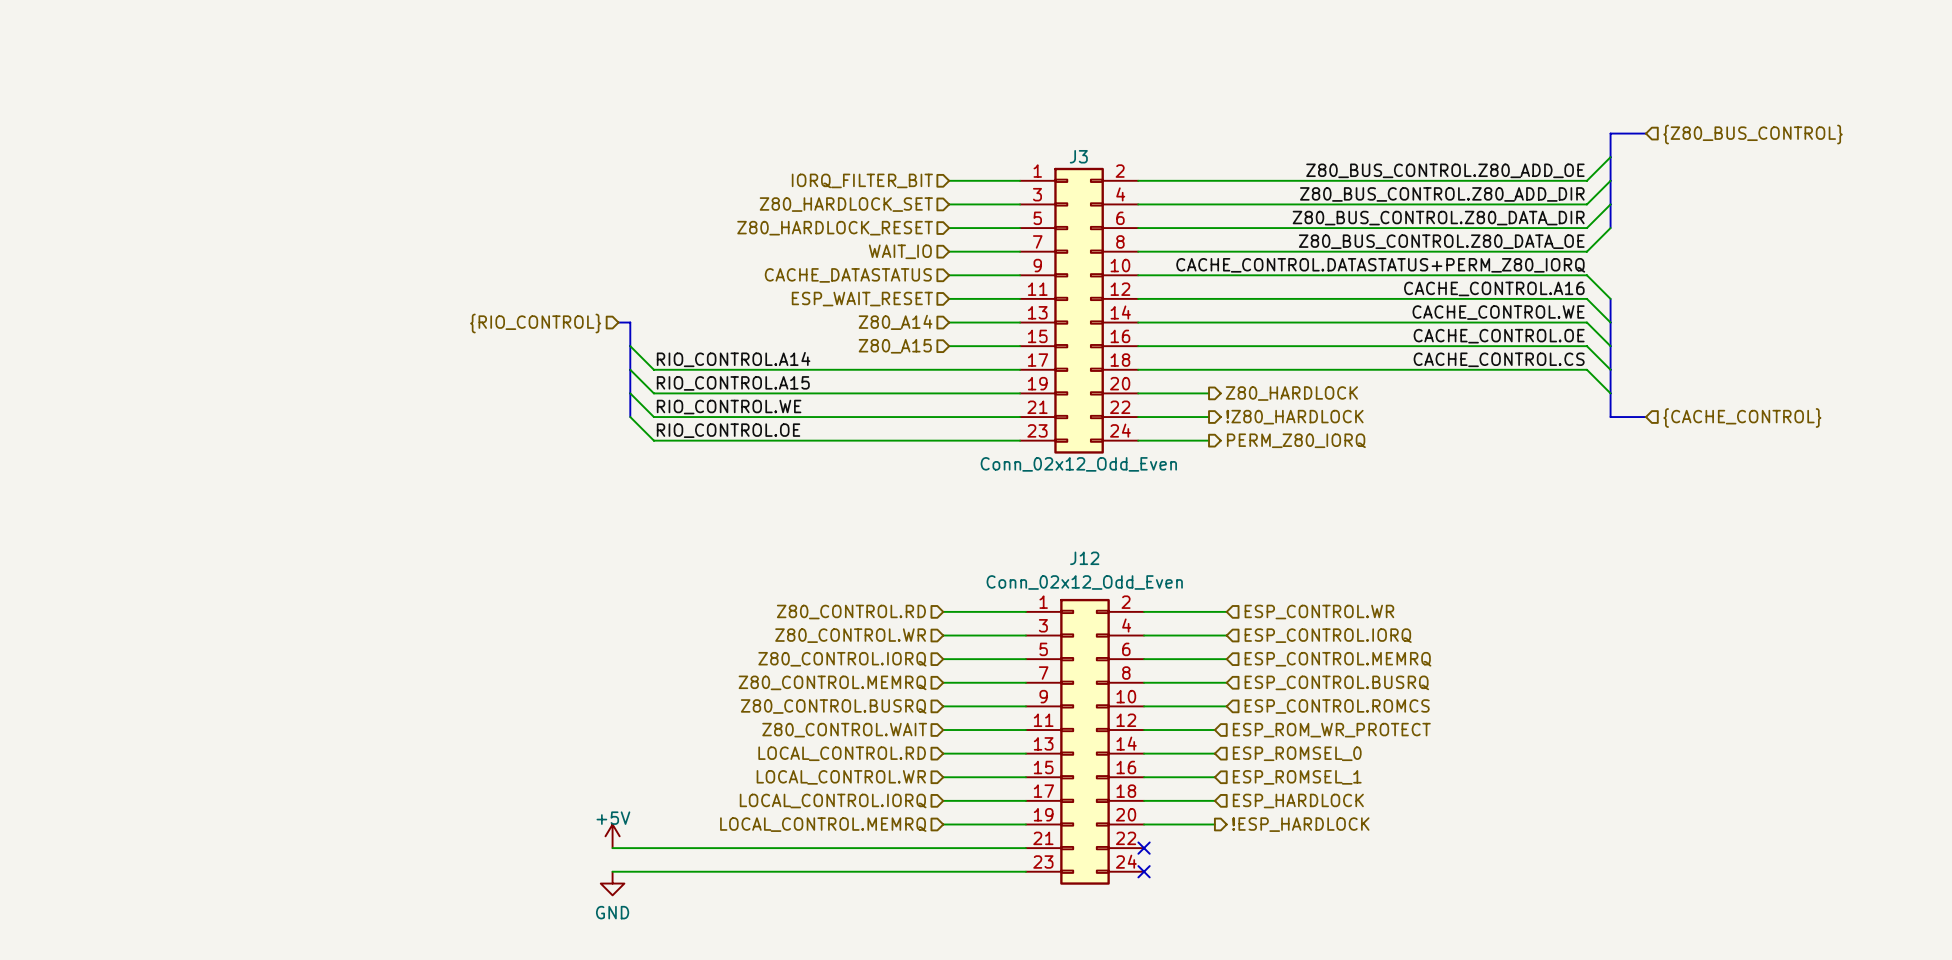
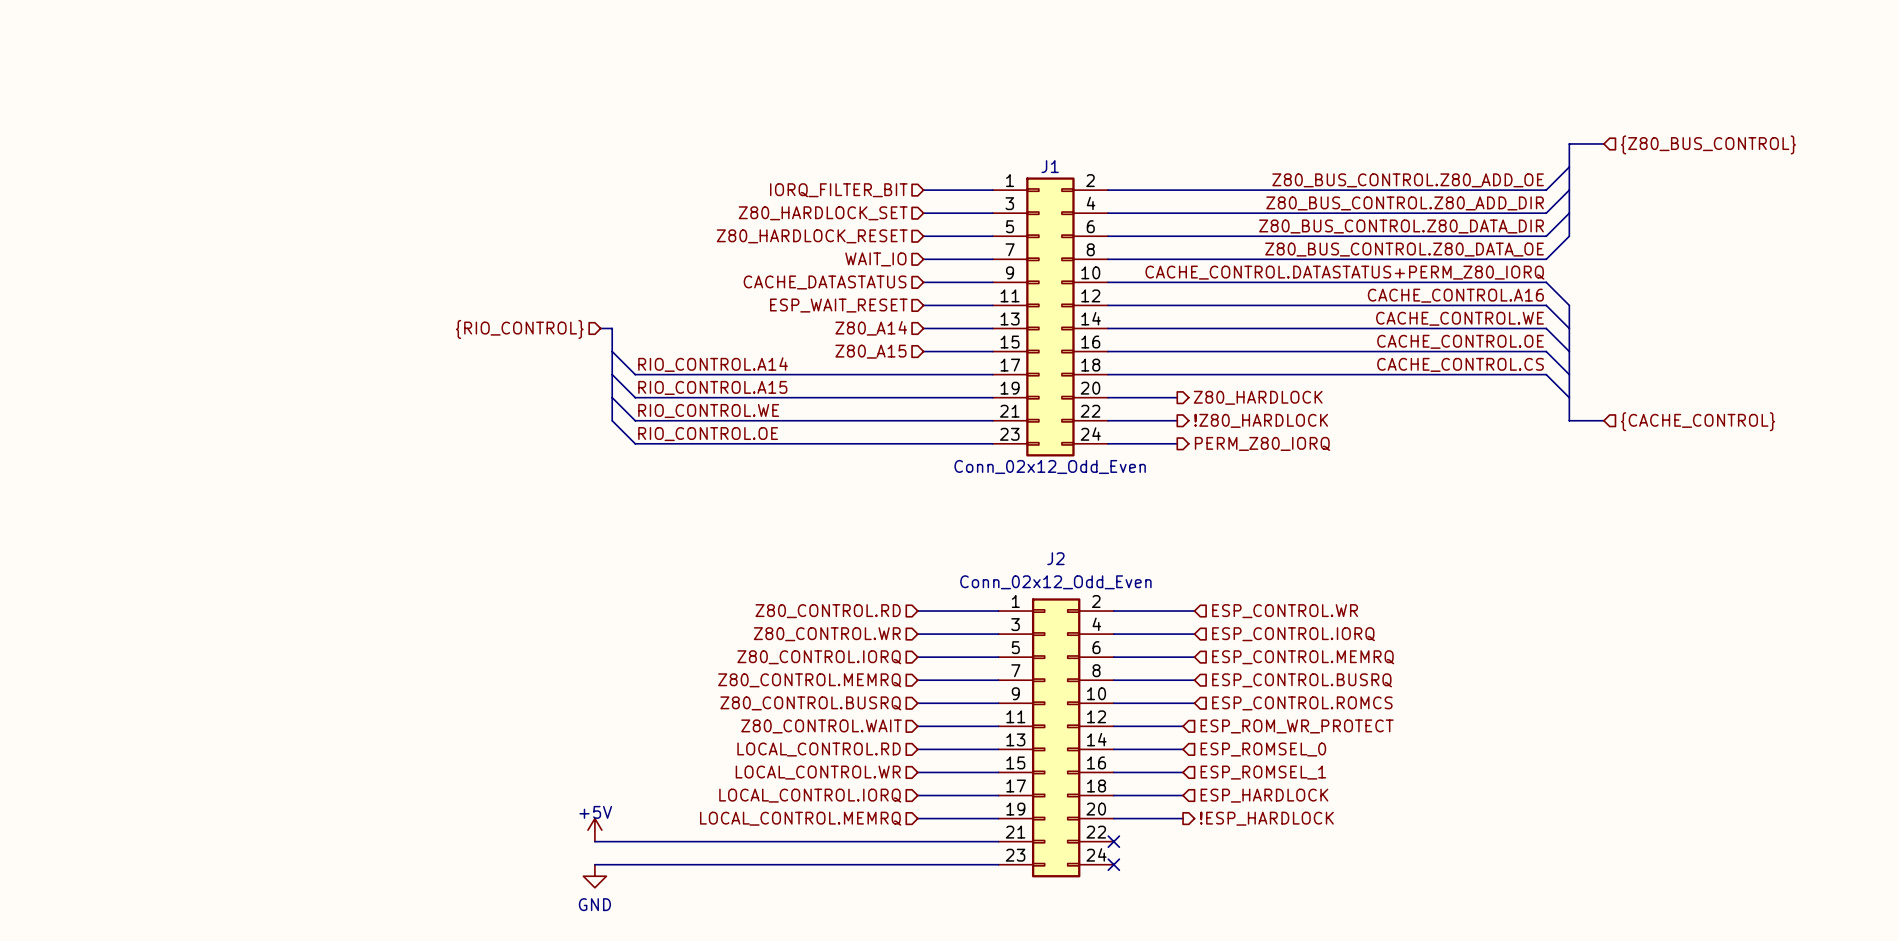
J3 name: J3 (1078, 156) -> J1 (1050, 166)
J12 name: J12 (1084, 558) -> J2 (1055, 558)

